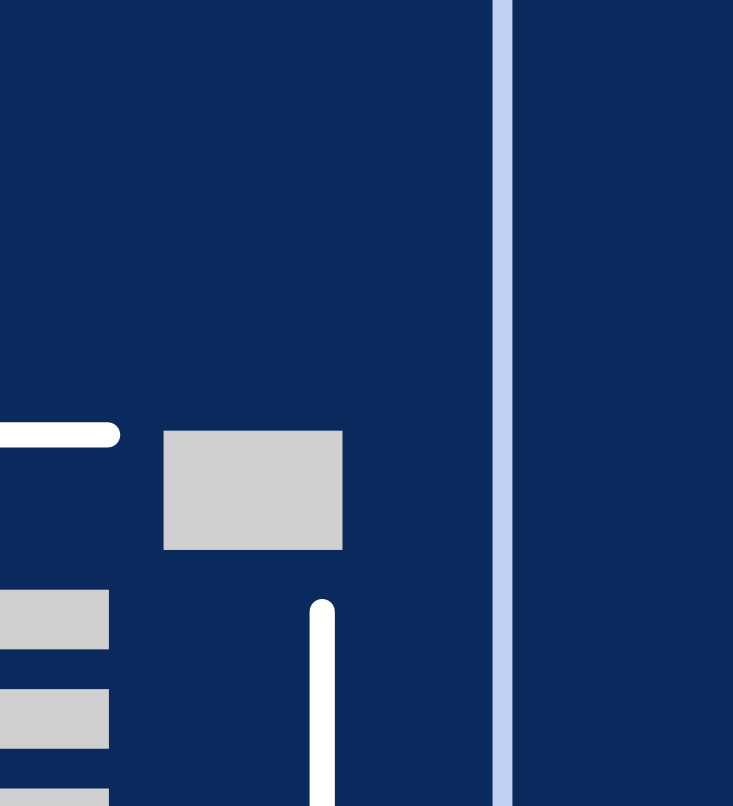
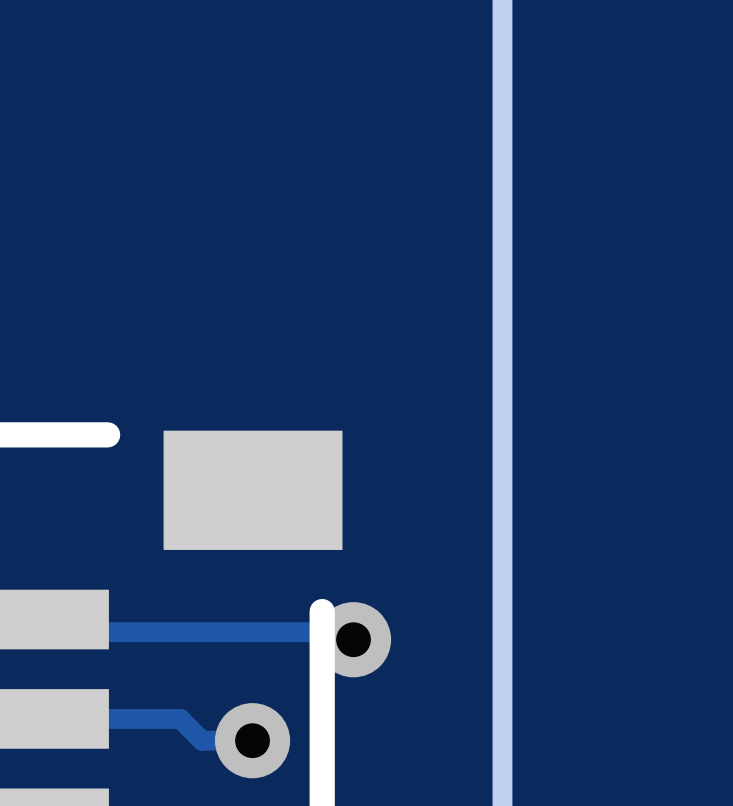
track: none -> (31, 619) (44, 632) (335, 632) (343, 639) (353, 639)
via: none -> (353, 639)
track: none -> (31, 718) (180, 718) (202, 740) (252, 740)
via: none -> (252, 740)

